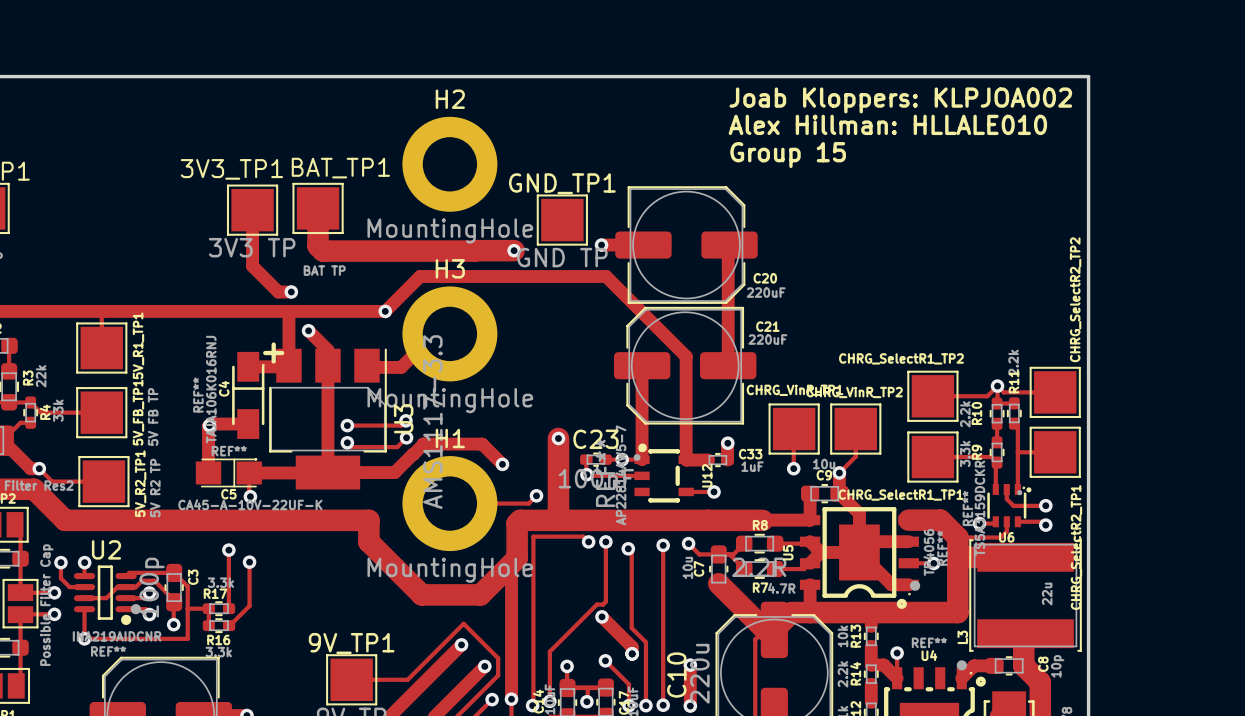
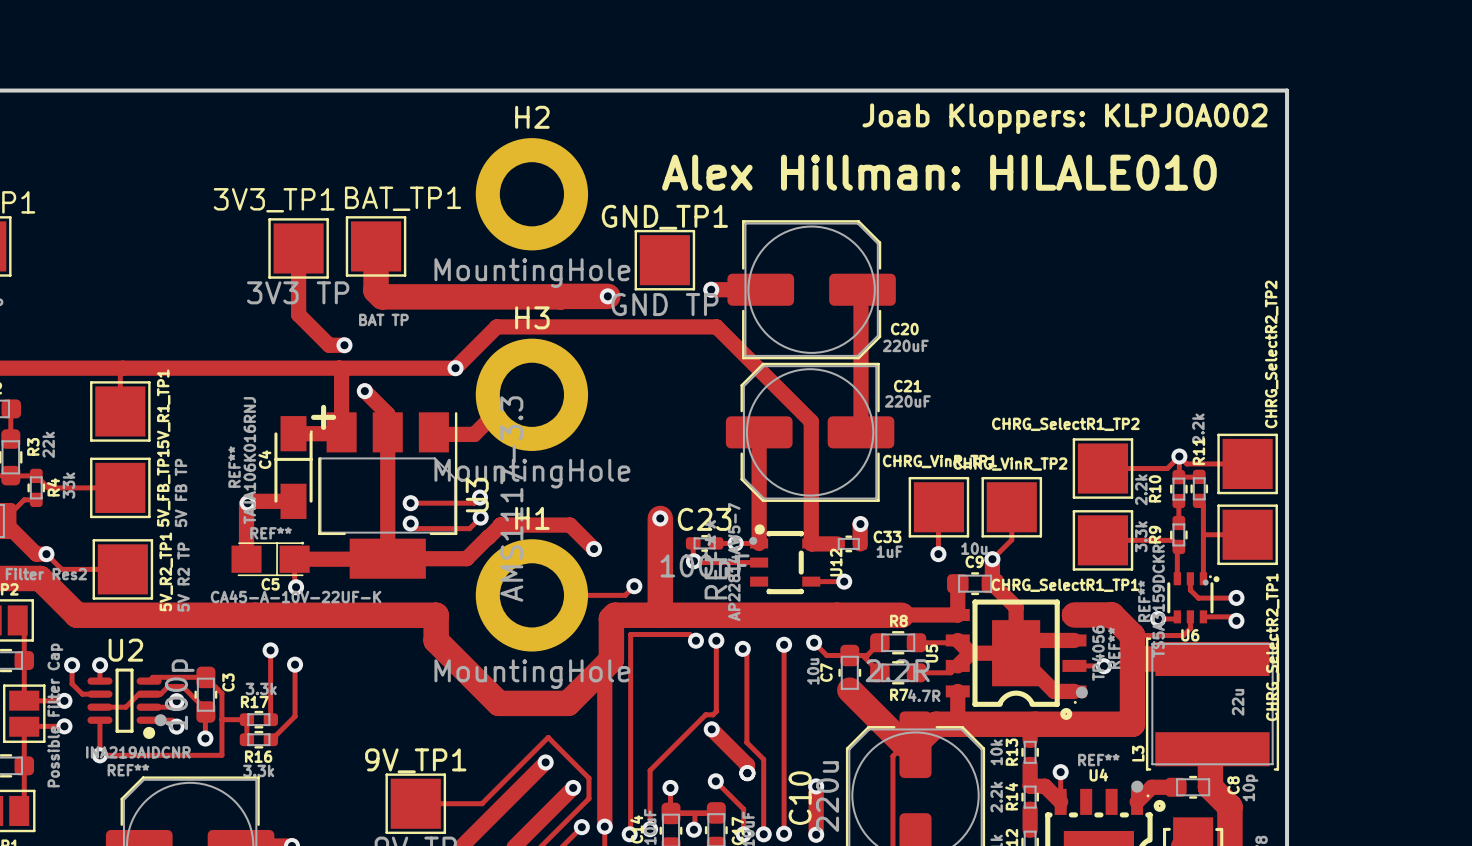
text: Alex Hillman: HLLALE010 (887, 124) -> Alex Hillman: HILALE010 (939, 172)
text: Group 15 (788, 155) -> none

